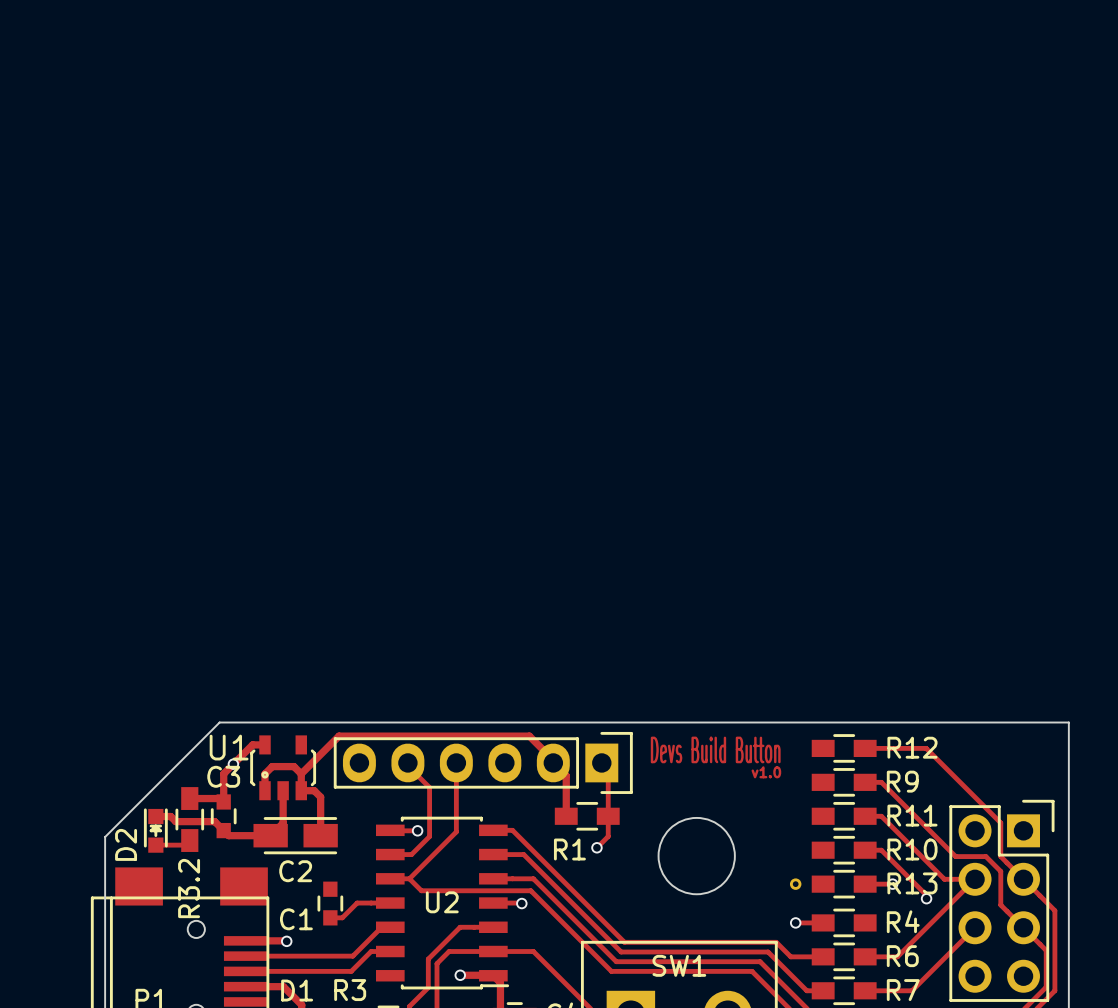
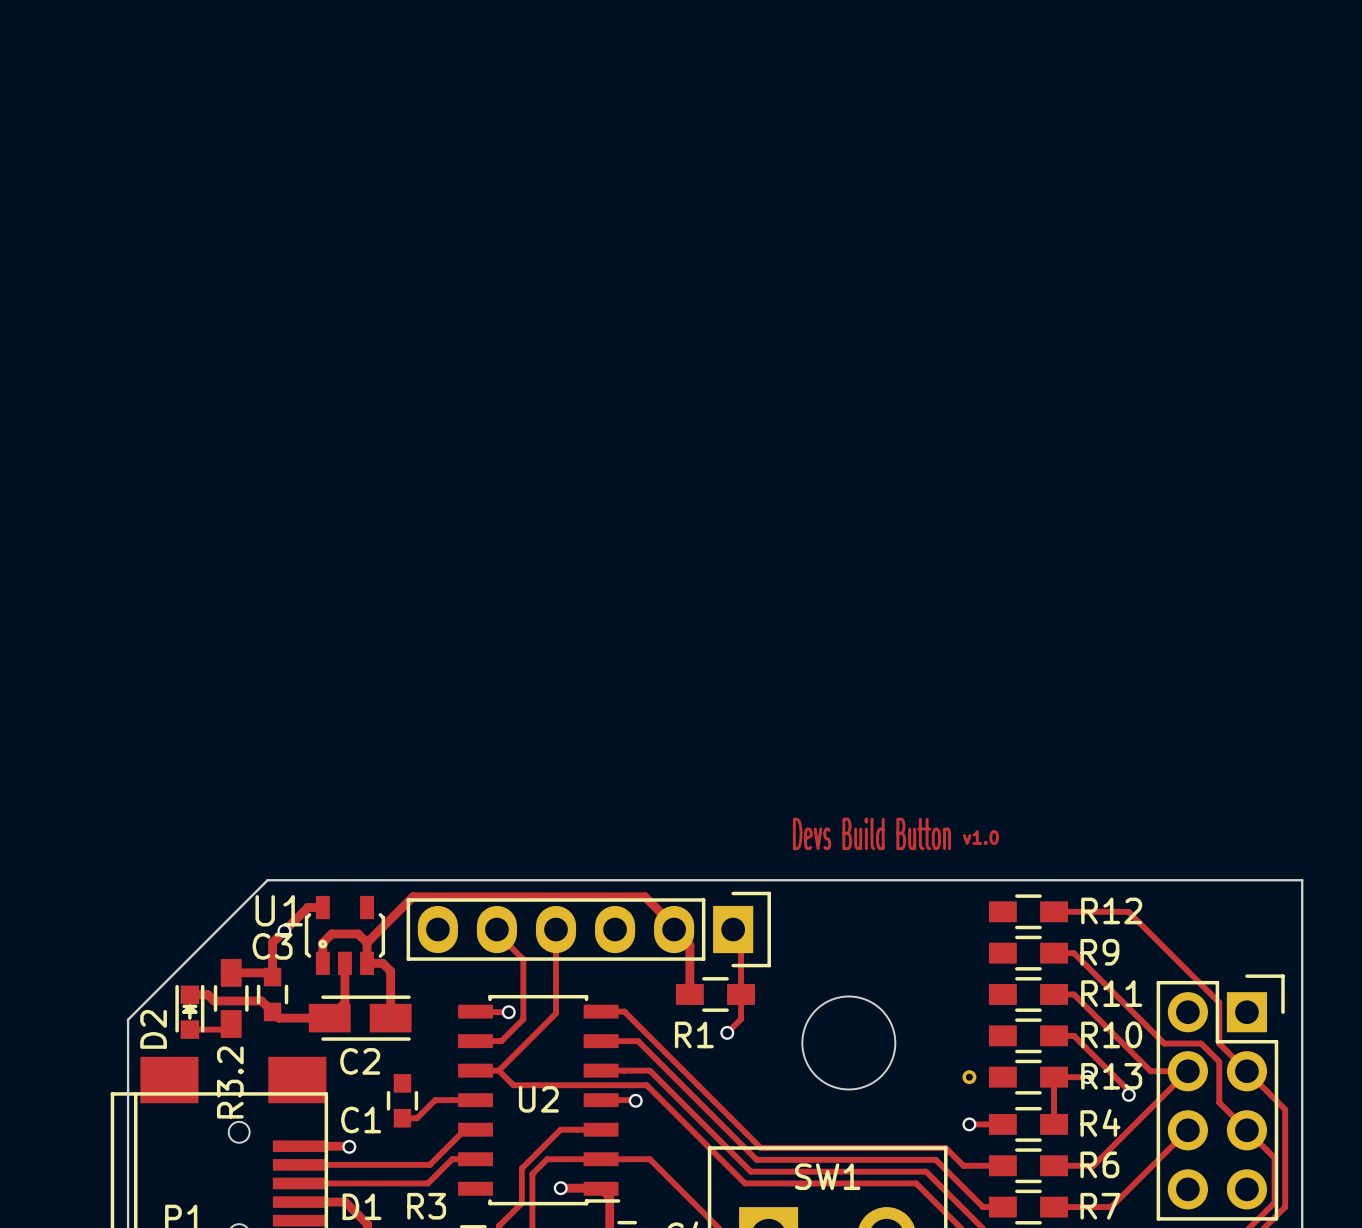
text position: Devs Build Button (715, 749) -> Devs Build Button (871, 833)
text position: v1.0 (766, 772) -> v1.0 (980, 837)
track: none -> (1054, 1077) (1054, 1124)

